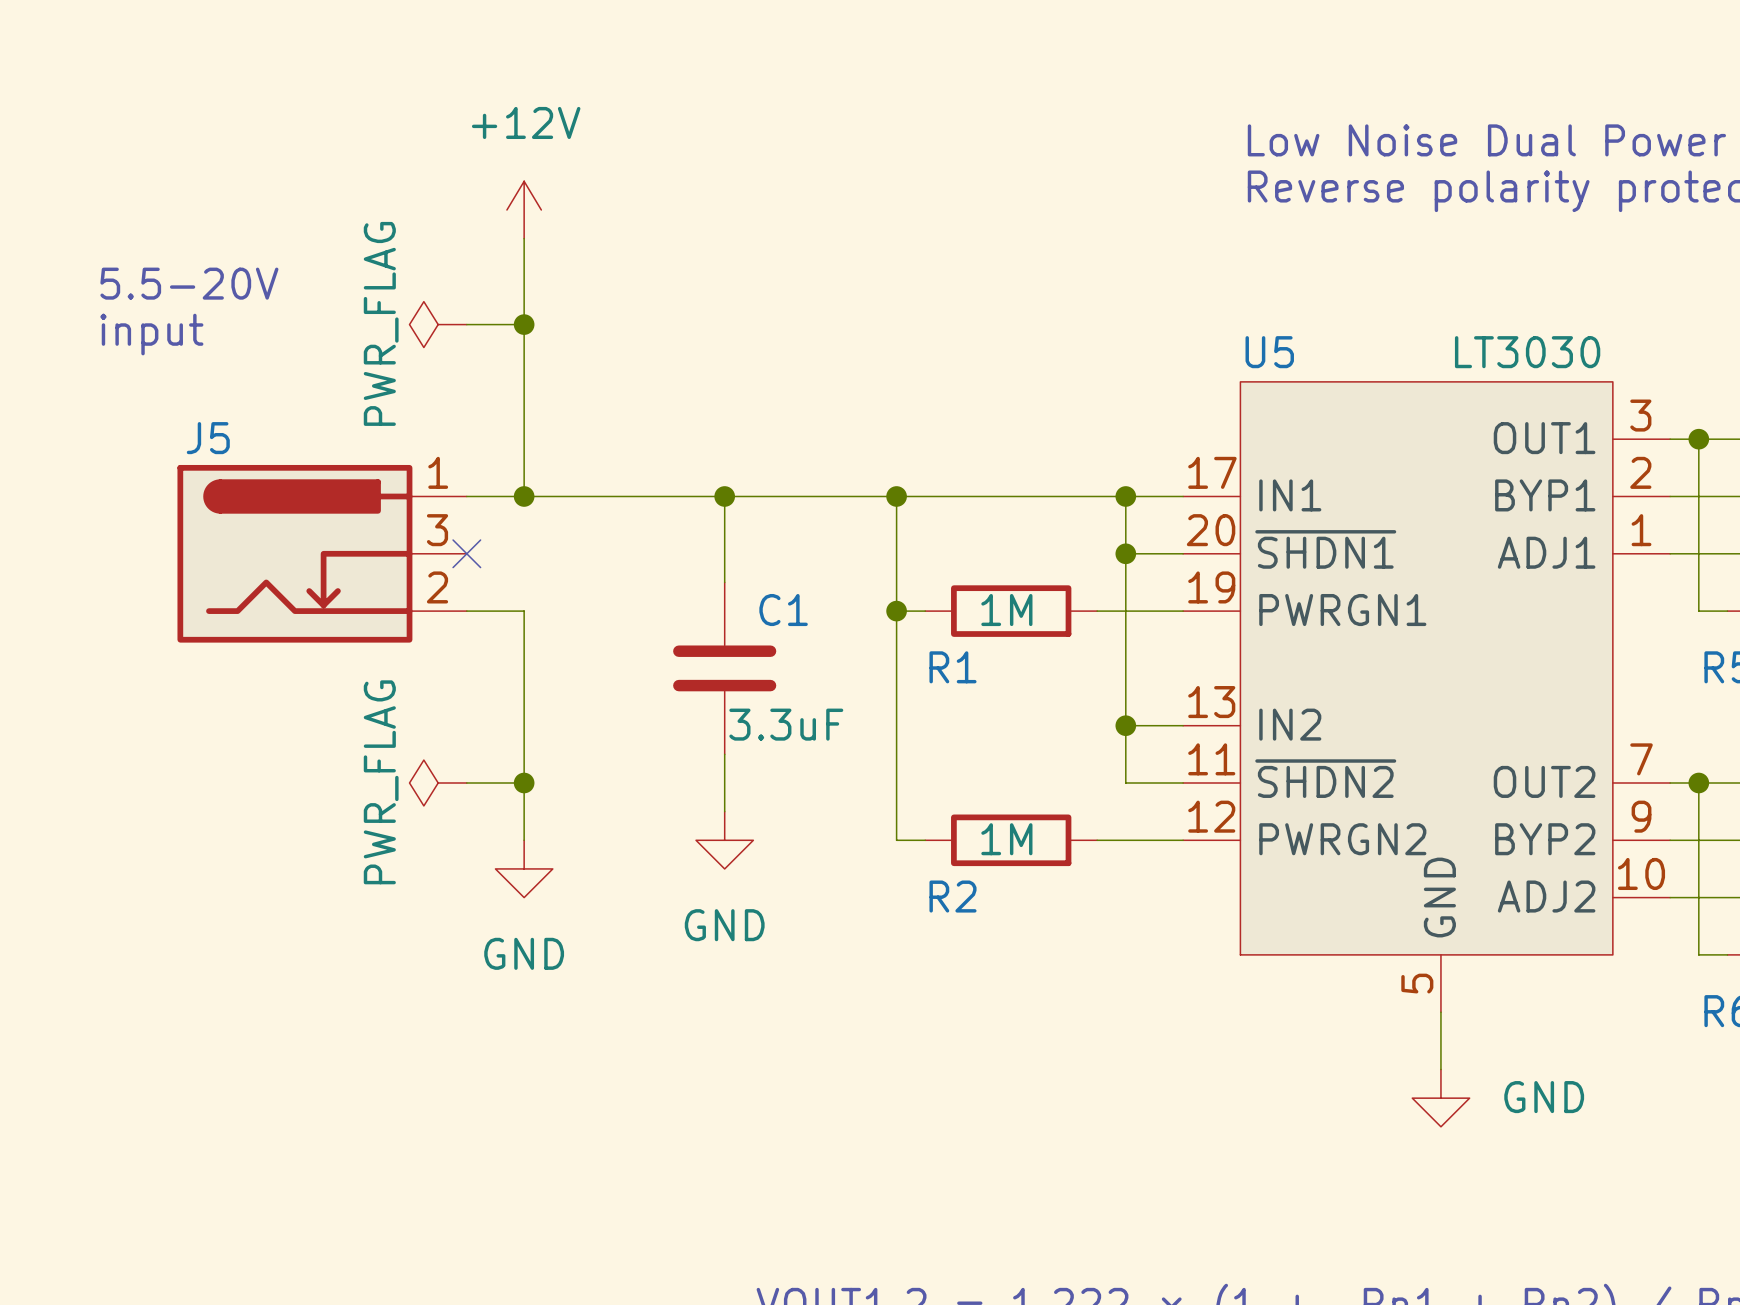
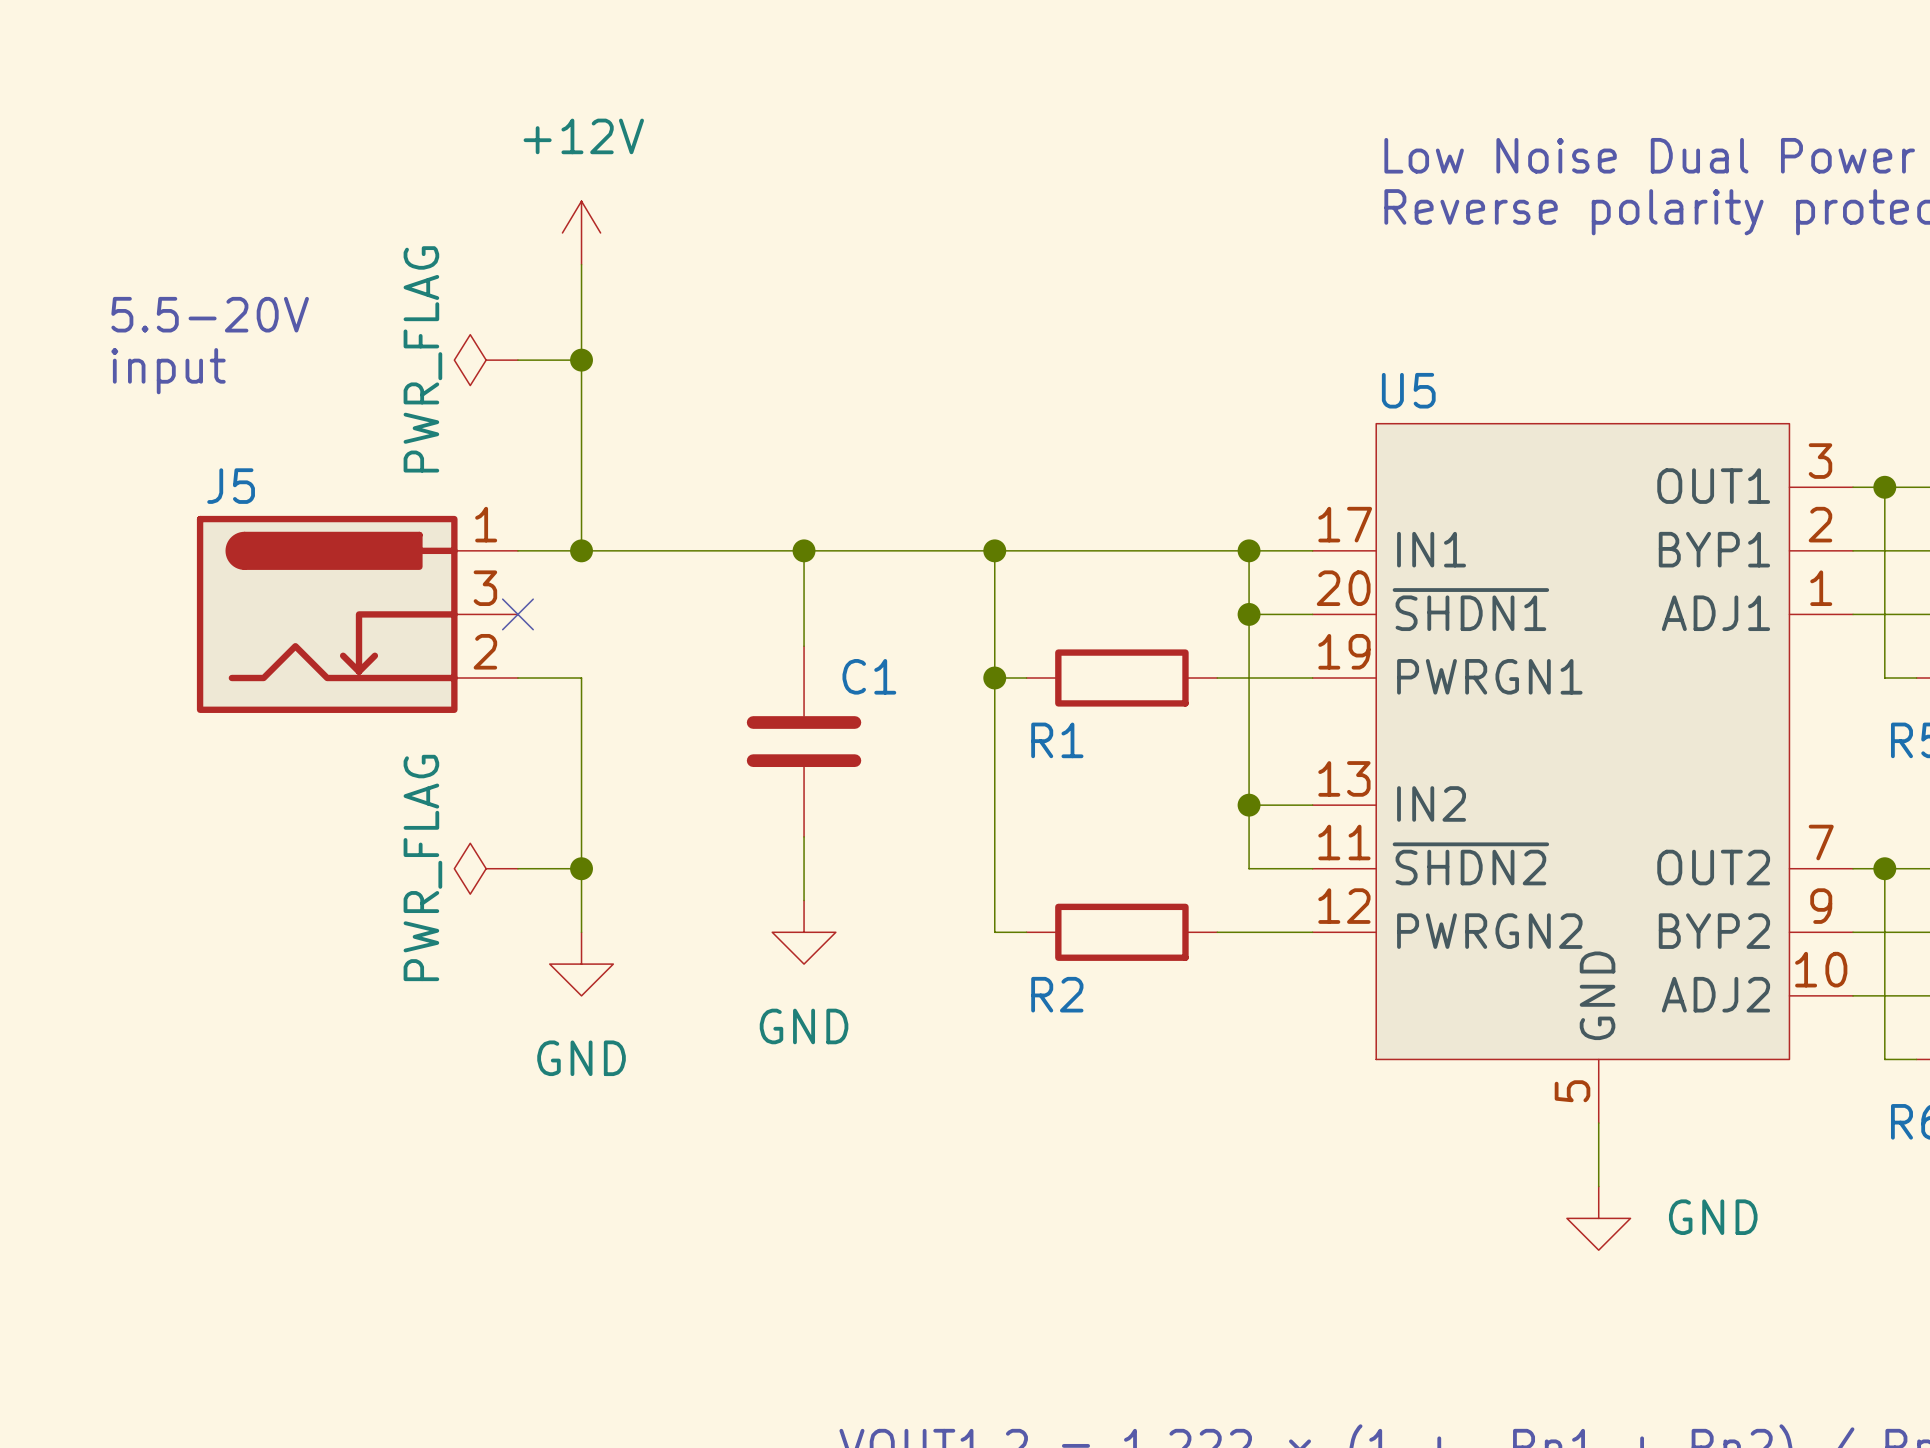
U5 value: LT3030 (1527, 352) -> none
R1 value: 1M (1006, 610) -> none
C1 value: 3.3uF (786, 724) -> none
R2 value: 1M (1006, 839) -> none

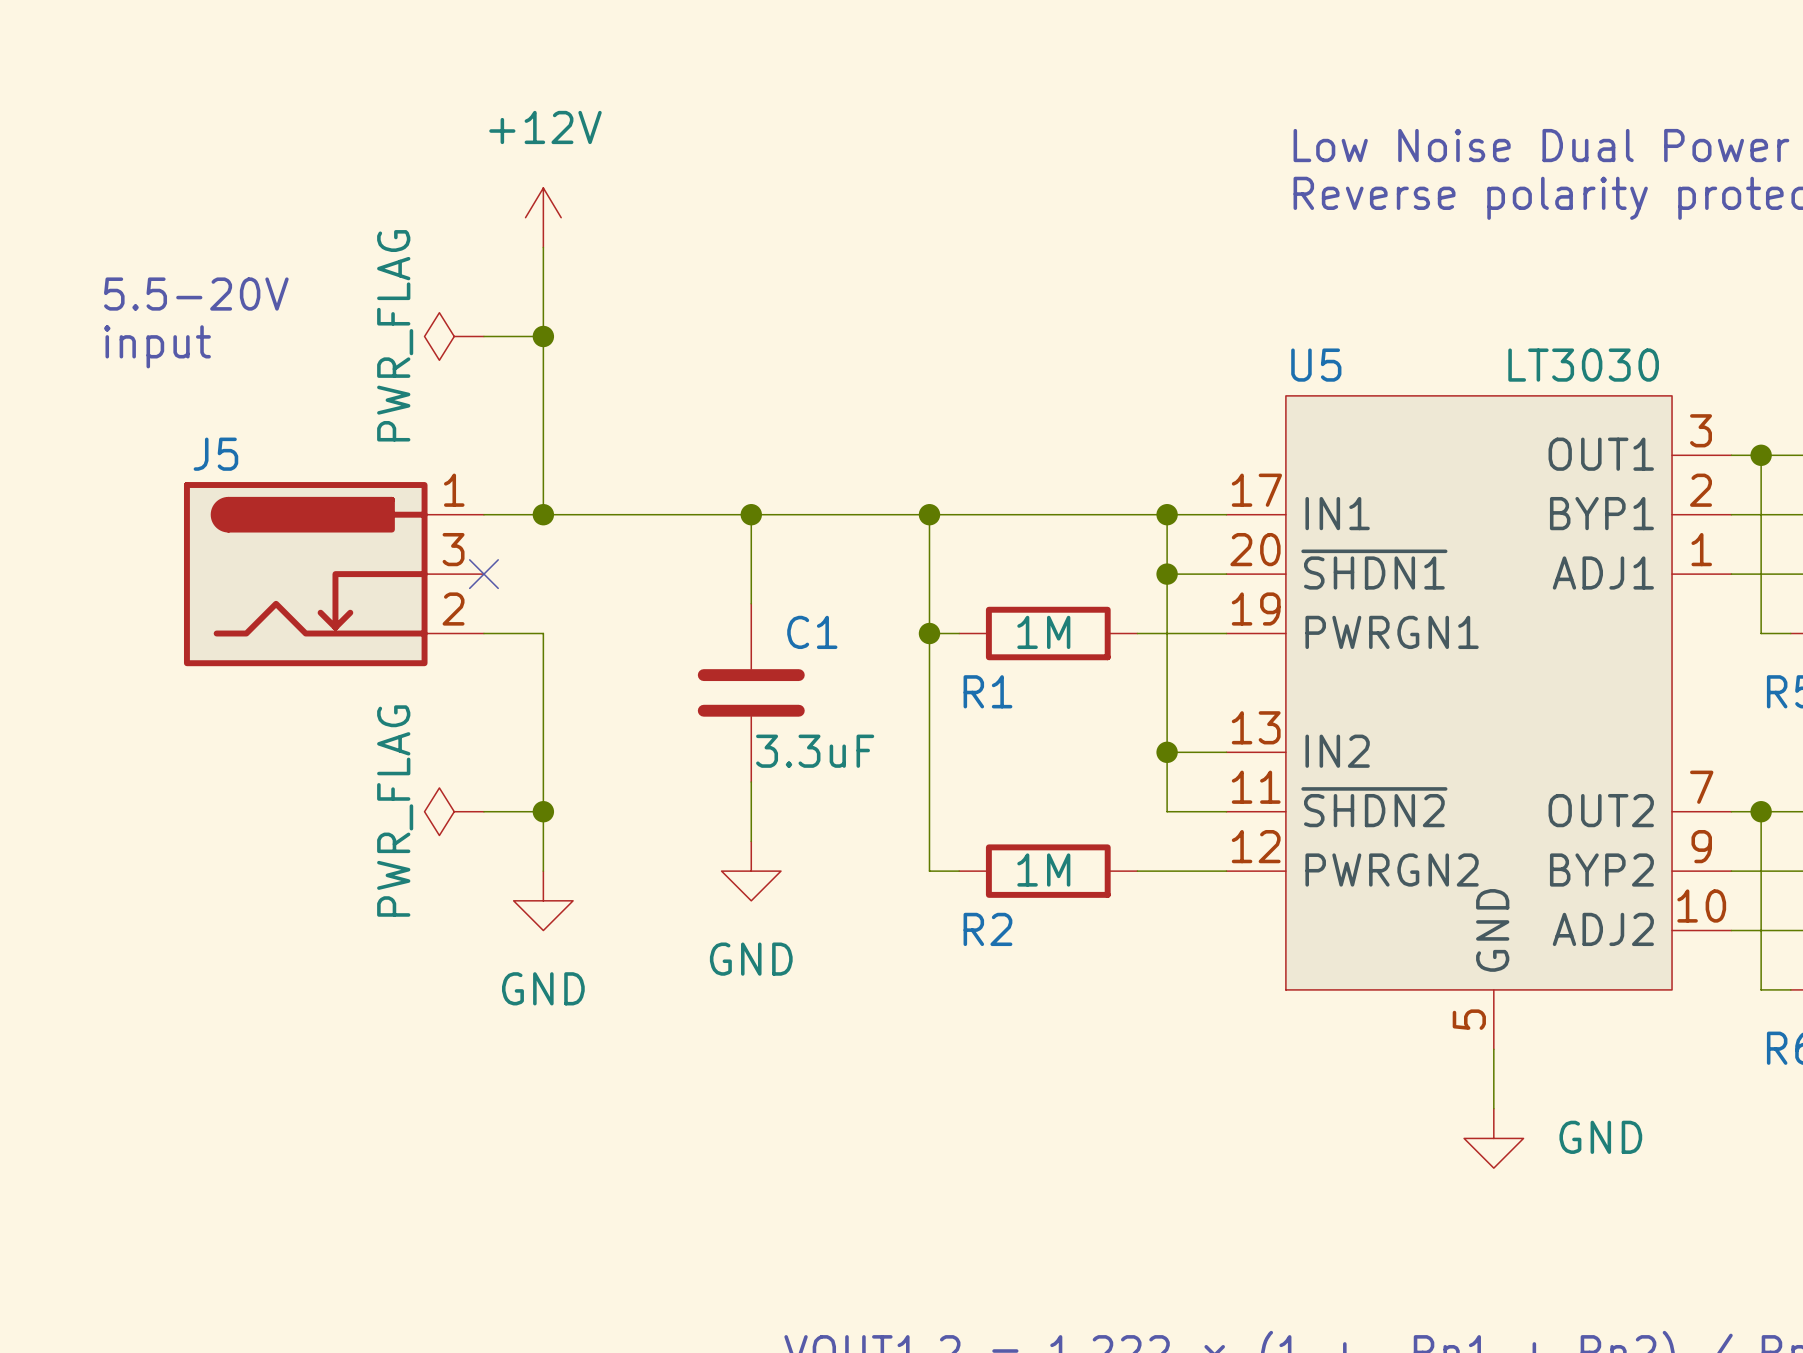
U5 value: none -> LT3030 (1583, 365)
R1 value: none -> 1M (1043, 632)
C1 value: none -> 3.3uF (815, 751)
R2 value: none -> 1M (1043, 870)

